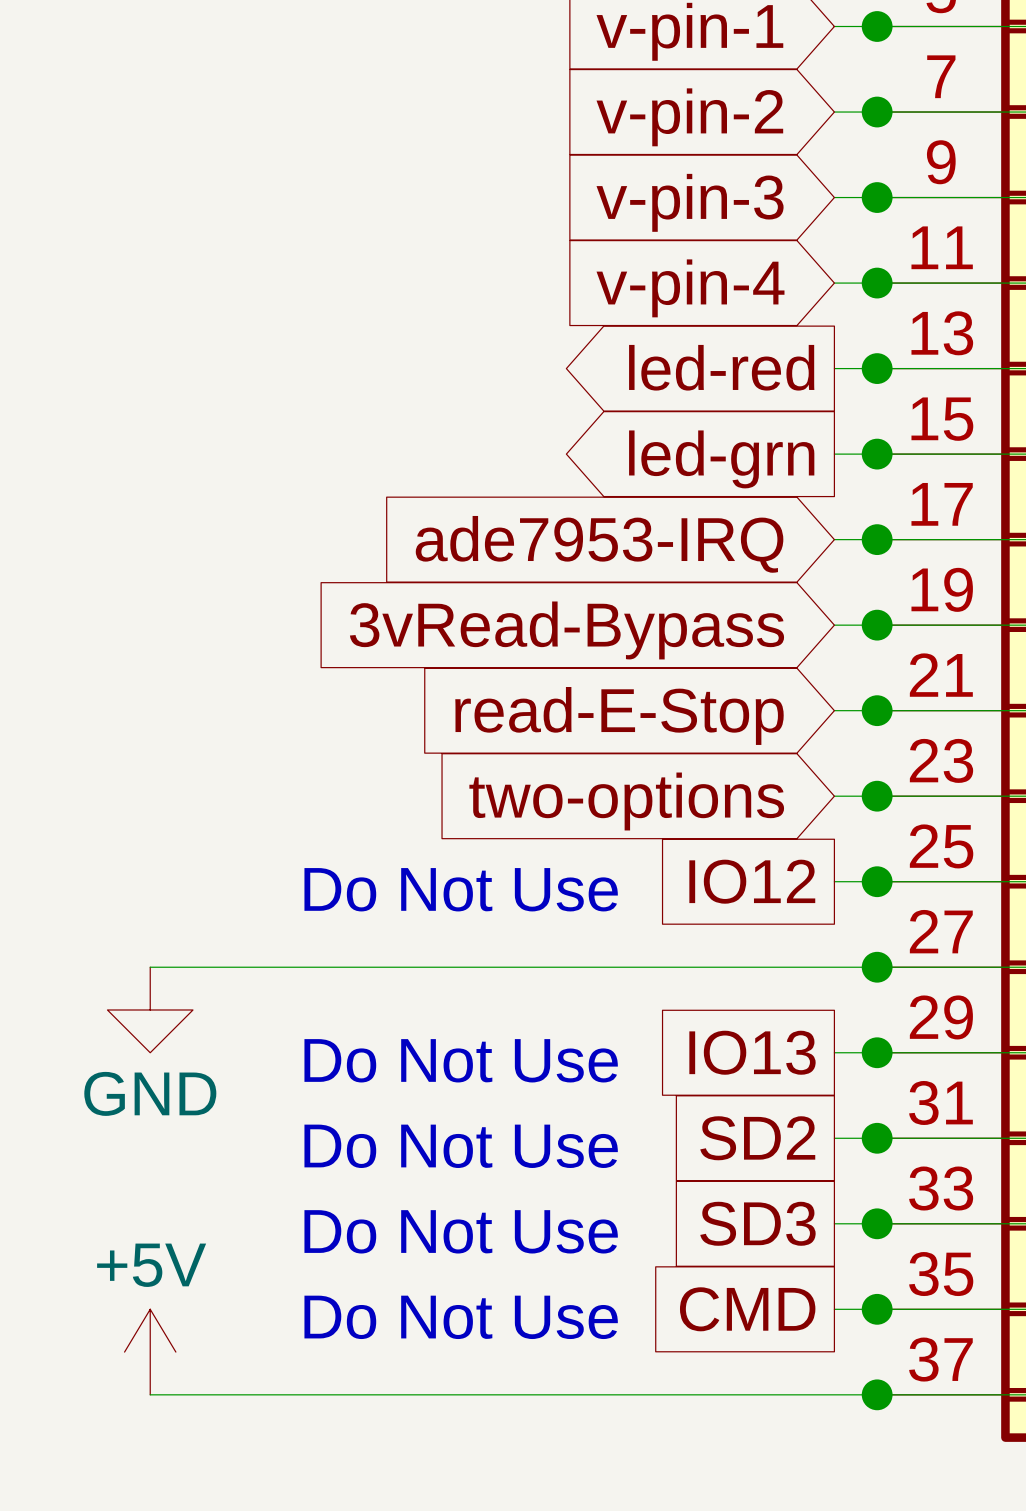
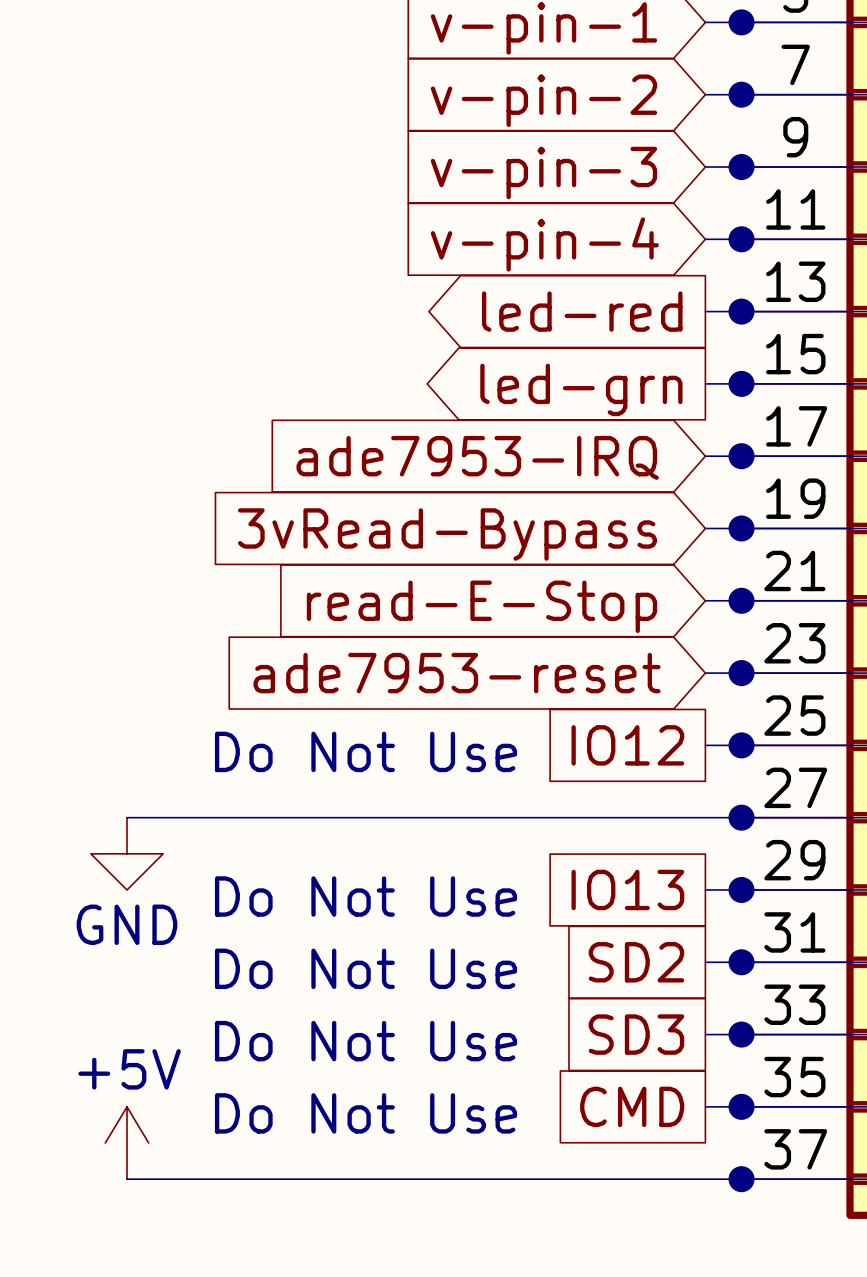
global label: two-options (626, 801) -> ade7953-reset (457, 673)

